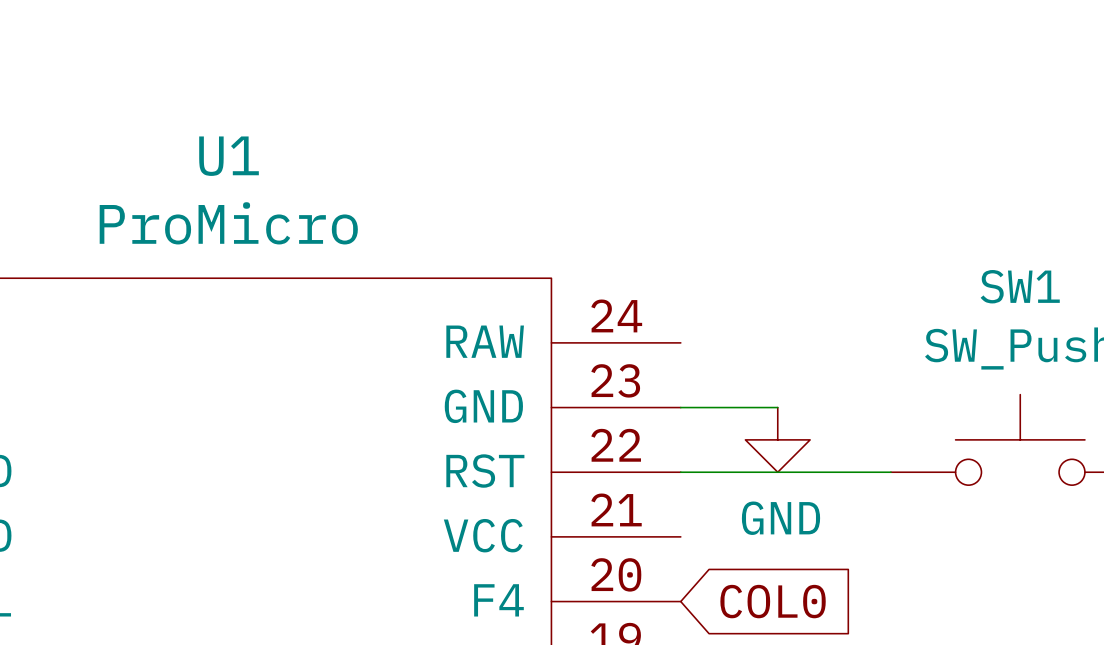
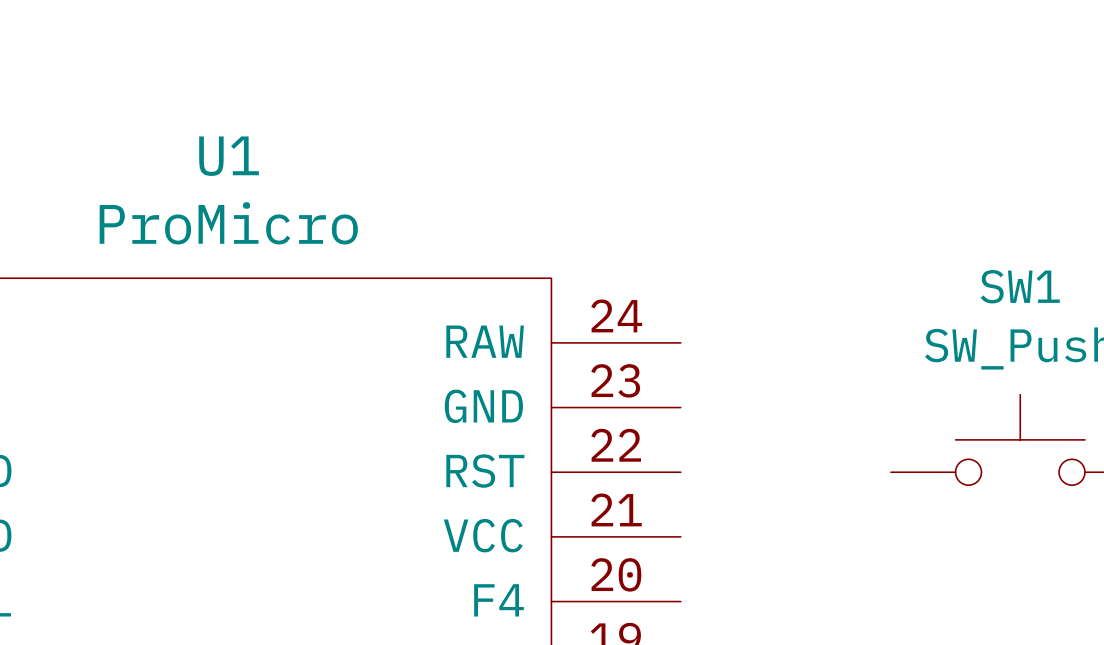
wire: (680, 407) (777, 407) -> none
power symbol: GND (777, 439) -> none
wire: (680, 472) (890, 472) -> none
global label: COL0 (773, 601) -> none

